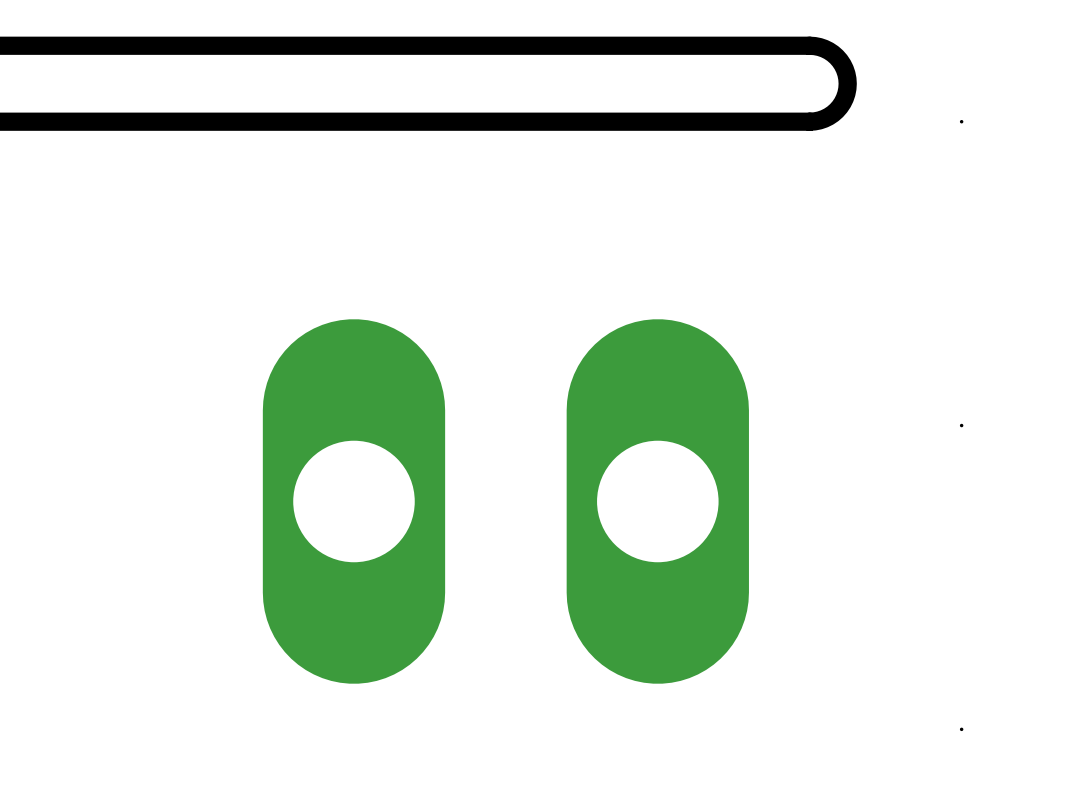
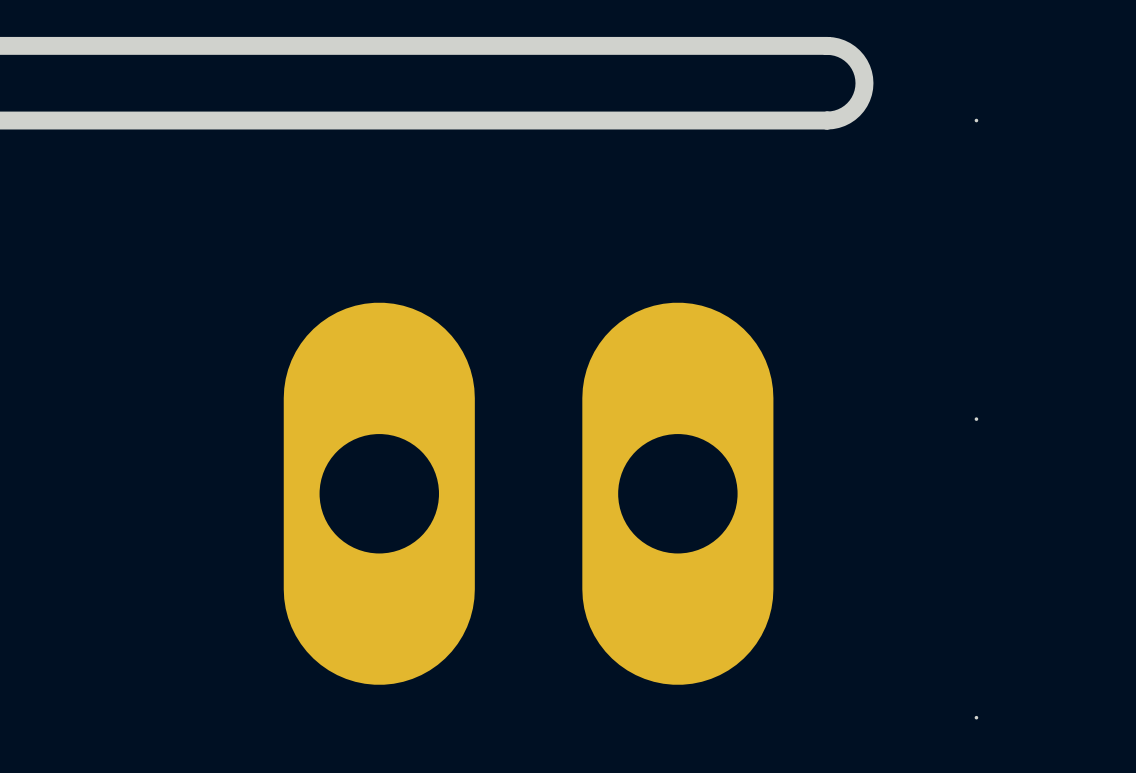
part footprint: [262, 319, 749, 684] -> [283, 302, 774, 685]

